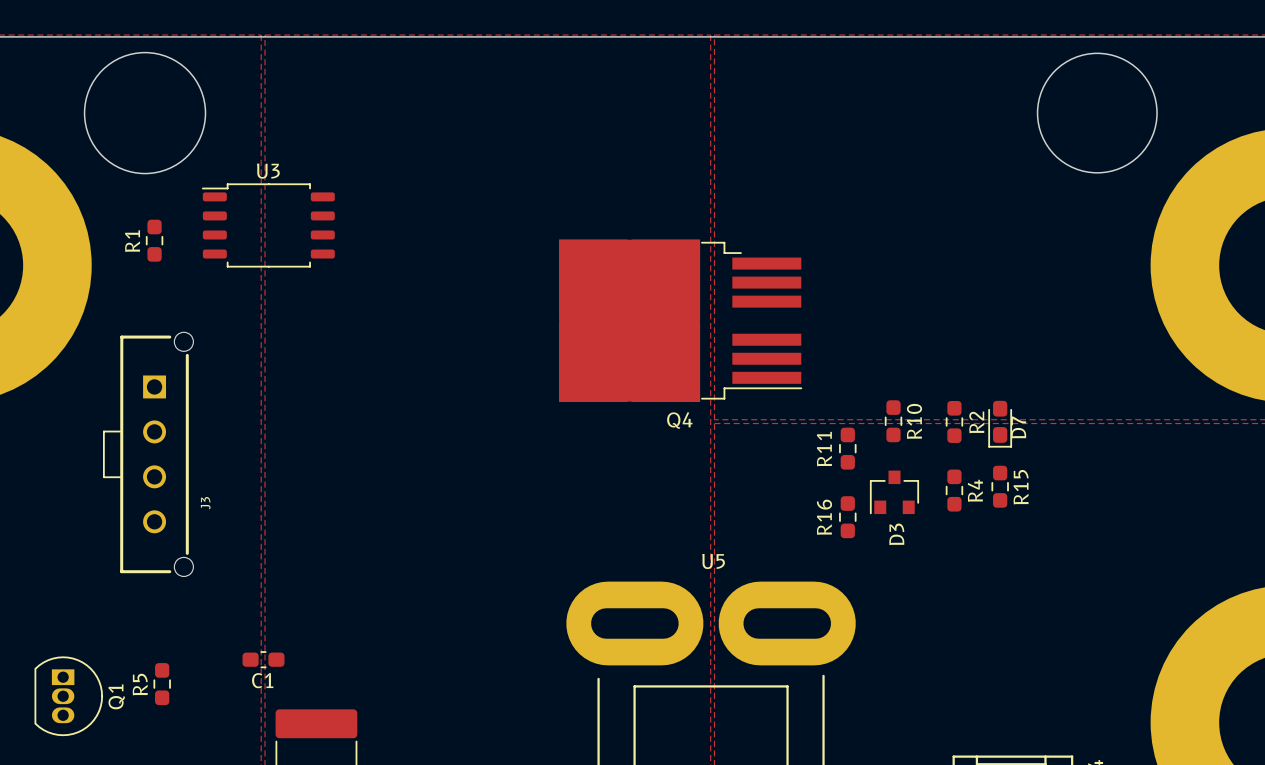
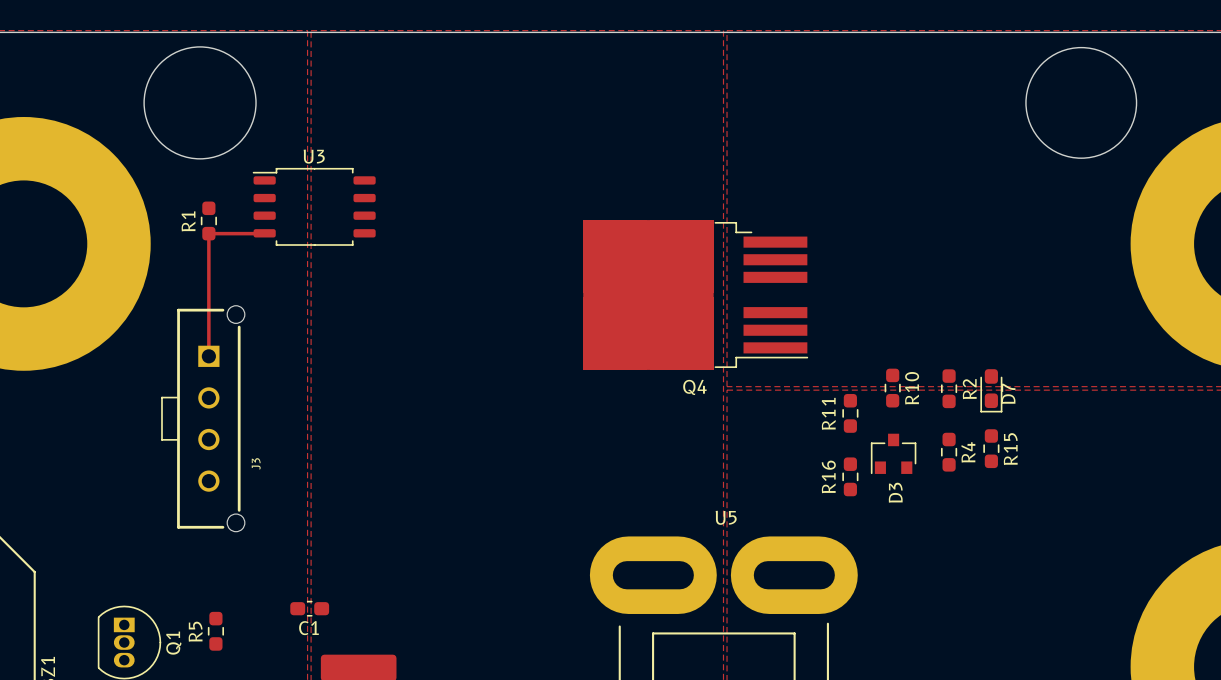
track: none -> (264, 233) (208, 233) (208, 356)

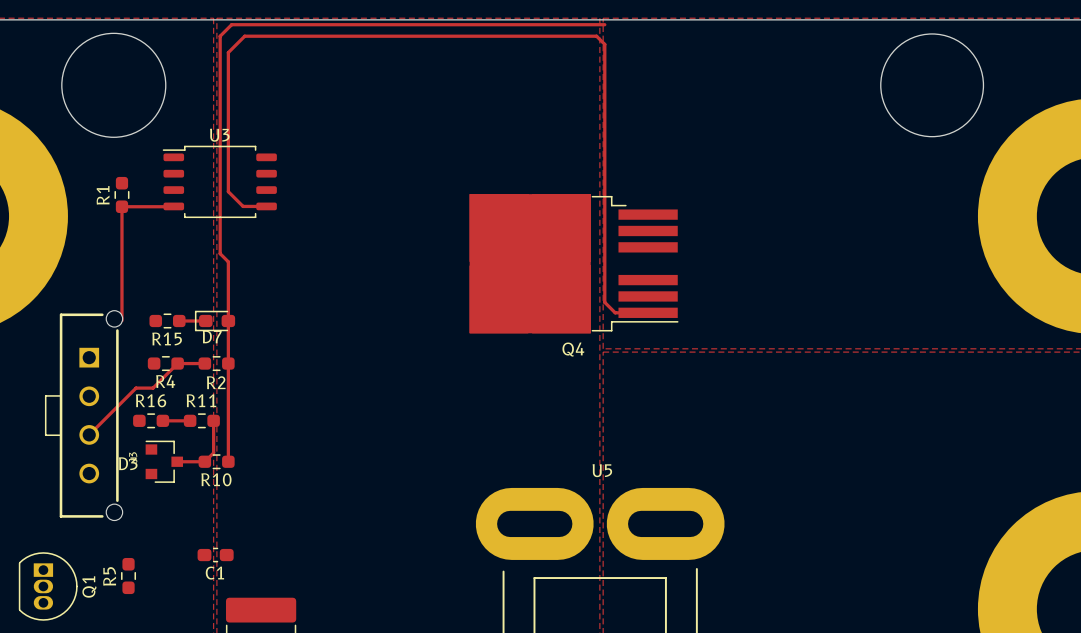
track: none -> (604, 24) (231, 24) (220, 36) (220, 253) (228, 261) (228, 461)
track: none -> (266, 206) (243, 206) (228, 191) (228, 52) (244, 36) (596, 36) (604, 44) (604, 302) (615, 312) (648, 312)
track: none -> (179, 321) (205, 321)
R10 rotation: 0° (892, 388) -> 90° clockwise (216, 461)
R10 position: (892, 388) -> (216, 461)
R2 rotation: 0° (949, 388) -> 90° clockwise (216, 363)
R2 position: (949, 388) -> (216, 363)
D7 rotation: 0° (991, 390) -> 90° clockwise (215, 321)
D7 position: (991, 390) -> (215, 321)
track: none -> (204, 363) (177, 363) (153, 388) (136, 388) (89, 434)
R11 rotation: 0° (850, 413) -> 90° clockwise (201, 420)
R11 position: (850, 413) -> (201, 420)
J3 position: (202, 418) -> (83, 415)
R15 rotation: 0° (991, 448) -> 90° clockwise (167, 321)
R15 position: (991, 448) -> (167, 321)
R4 rotation: 0° (949, 452) -> 90° clockwise (165, 363)
R4 position: (949, 452) -> (165, 363)
D3 rotation: 0° (893, 453) -> 90° clockwise (164, 461)
D3 position: (893, 453) -> (164, 461)
track: none -> (162, 420) (190, 420)
track: none -> (213, 420) (213, 452) (204, 461) (177, 461)
R16 rotation: 0° (850, 476) -> 90° clockwise (151, 420)
R16 position: (850, 476) -> (151, 420)

